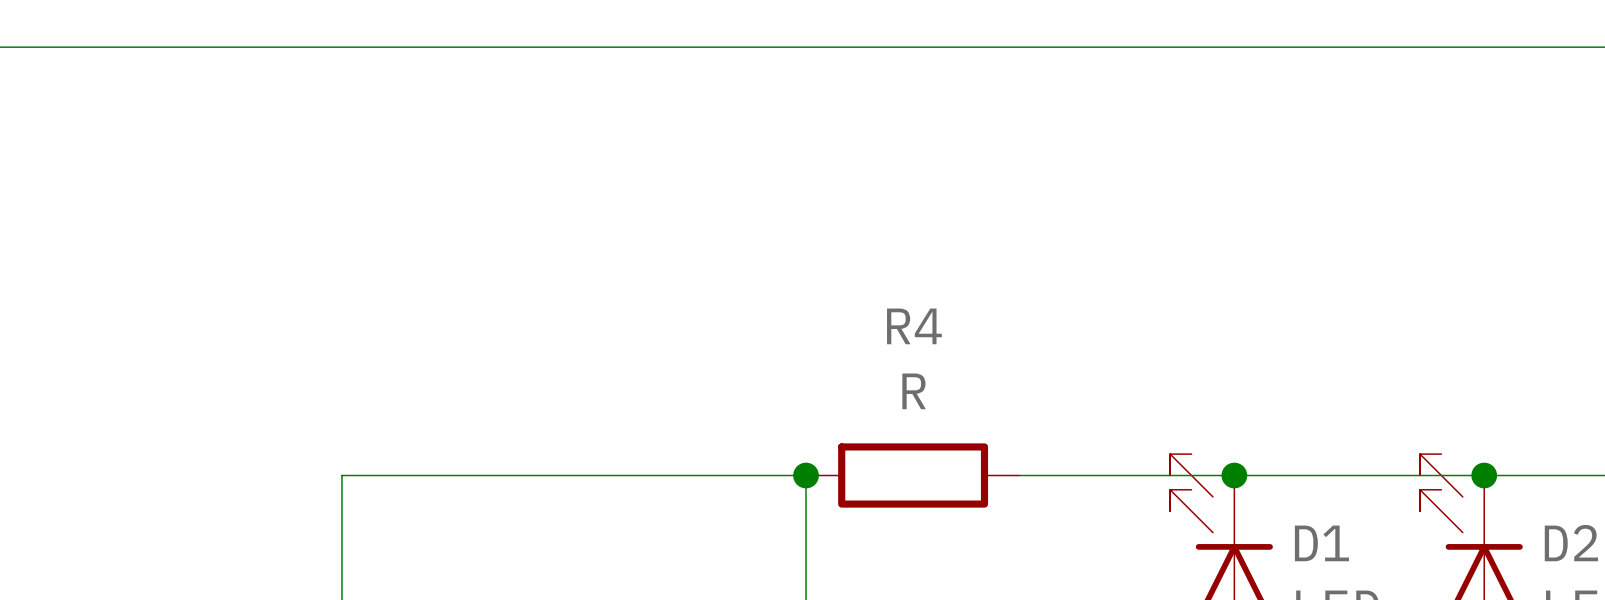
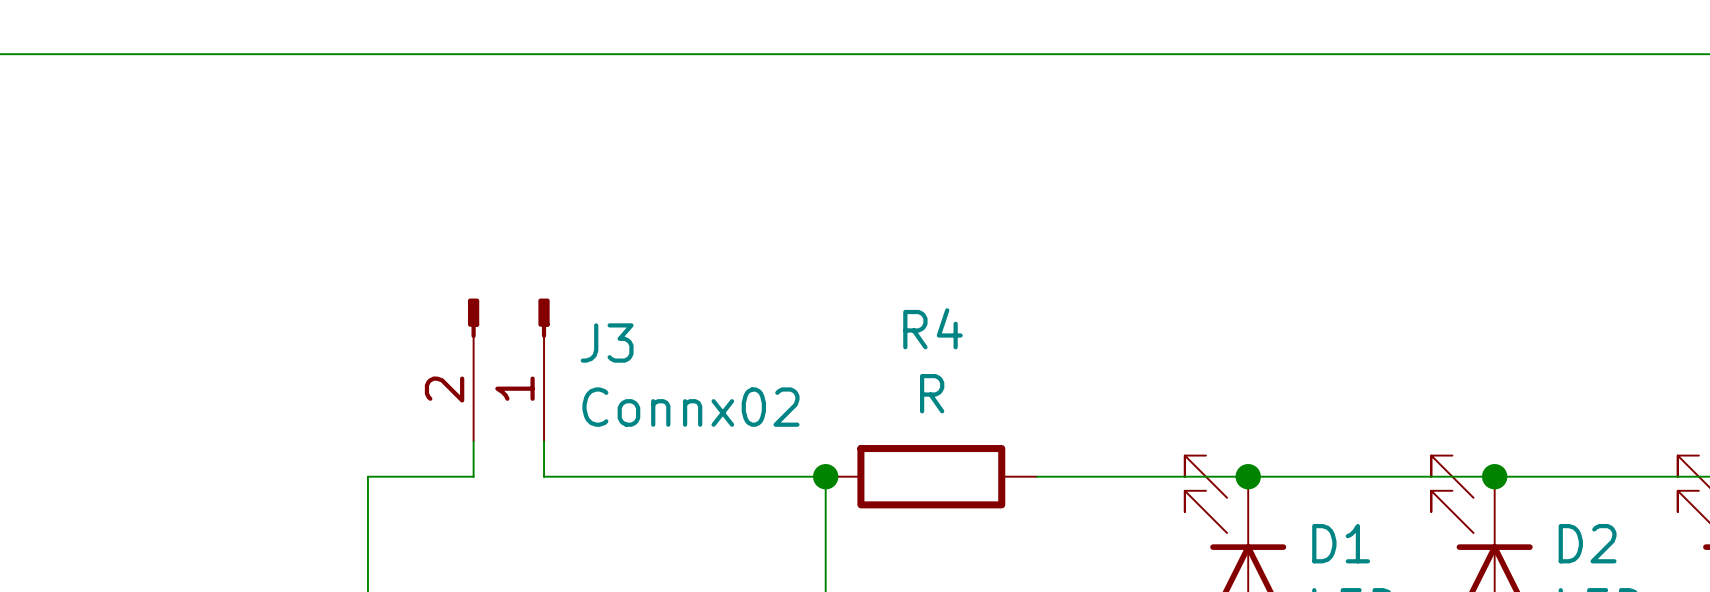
J3: none -> Connx02 (508, 370)
wire: none -> (544, 441) (544, 476)
wire: (449, 475) (520, 475) -> (473, 476) (473, 441)

